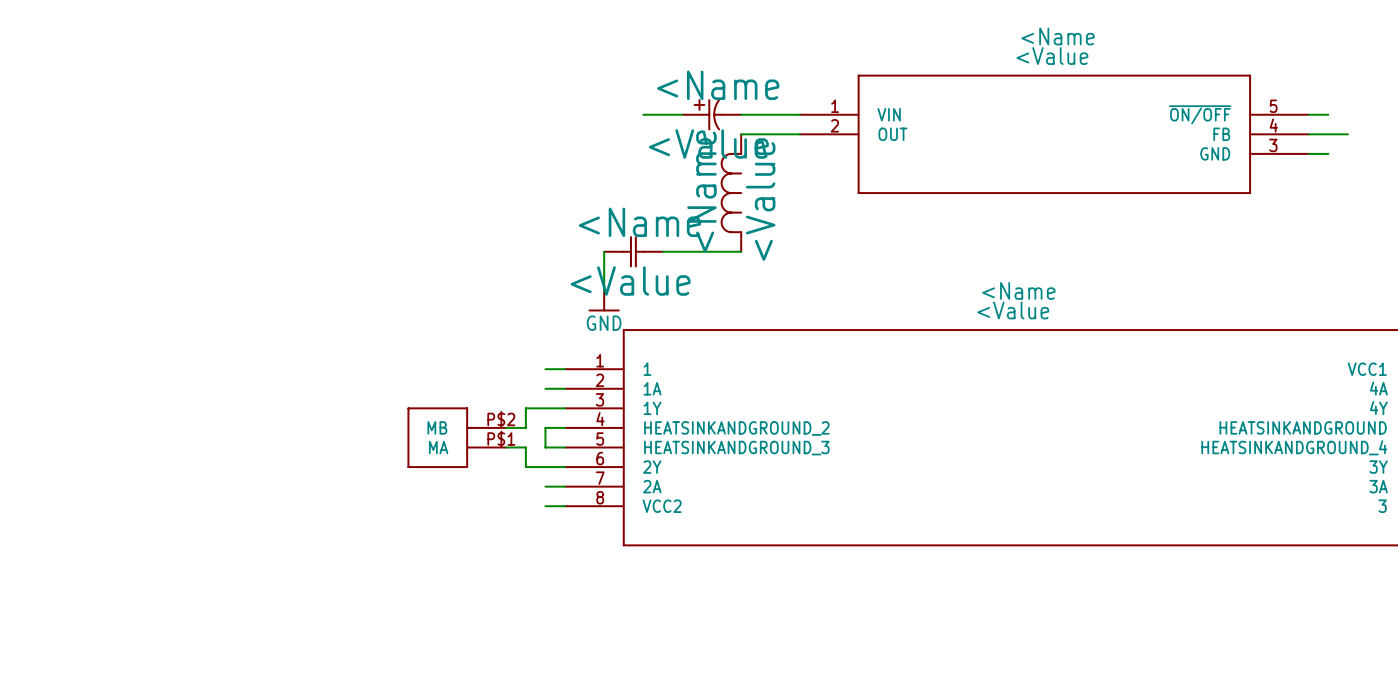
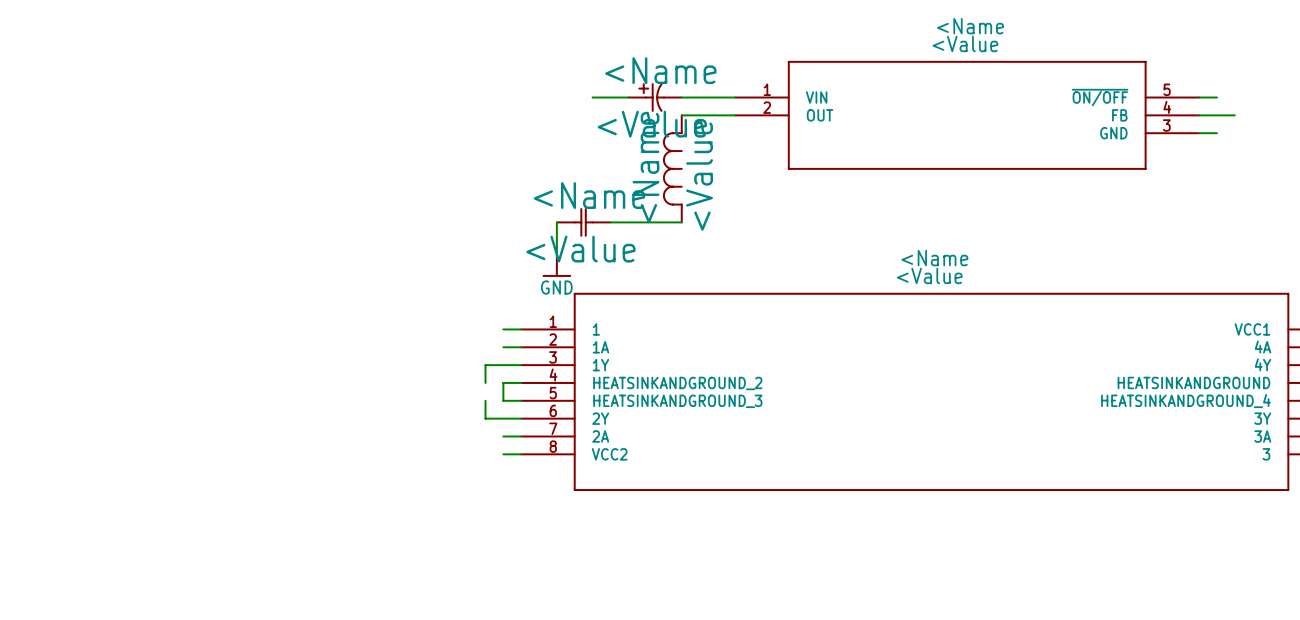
wire: (506, 427) (525, 427) -> none
part: (456, 437) -> none
wire: (506, 447) (525, 447) -> none

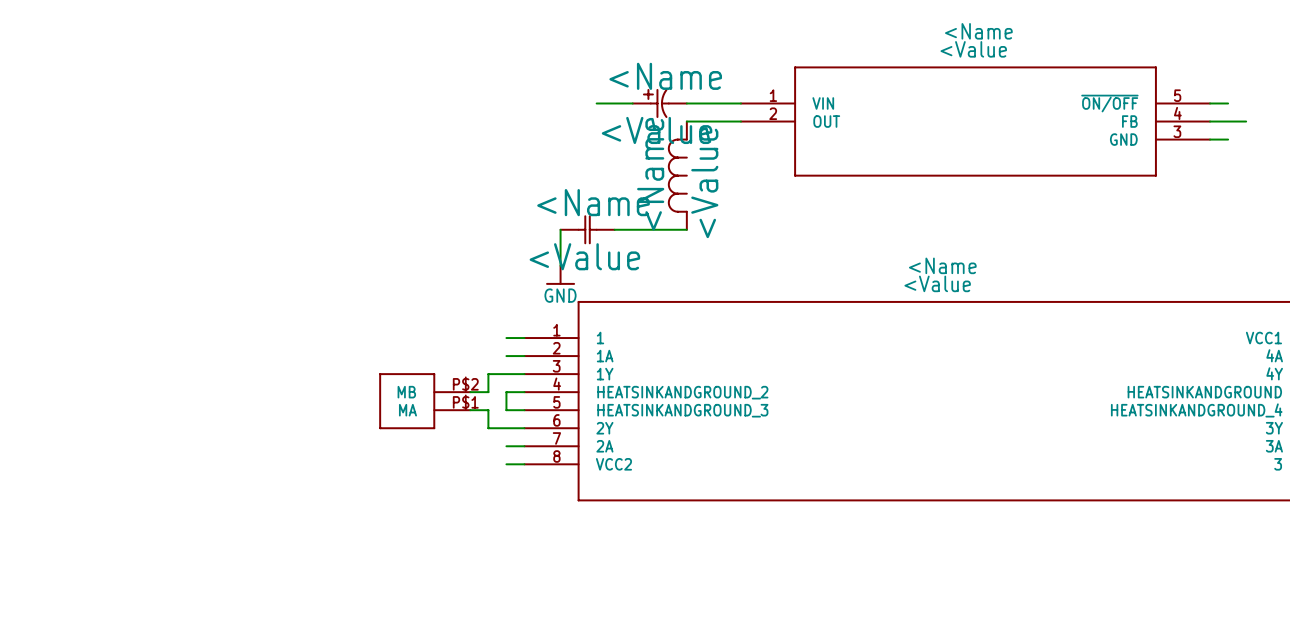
wire: none -> (470, 392) (488, 392)
part: none -> (424, 401)
wire: none -> (470, 410) (488, 410)

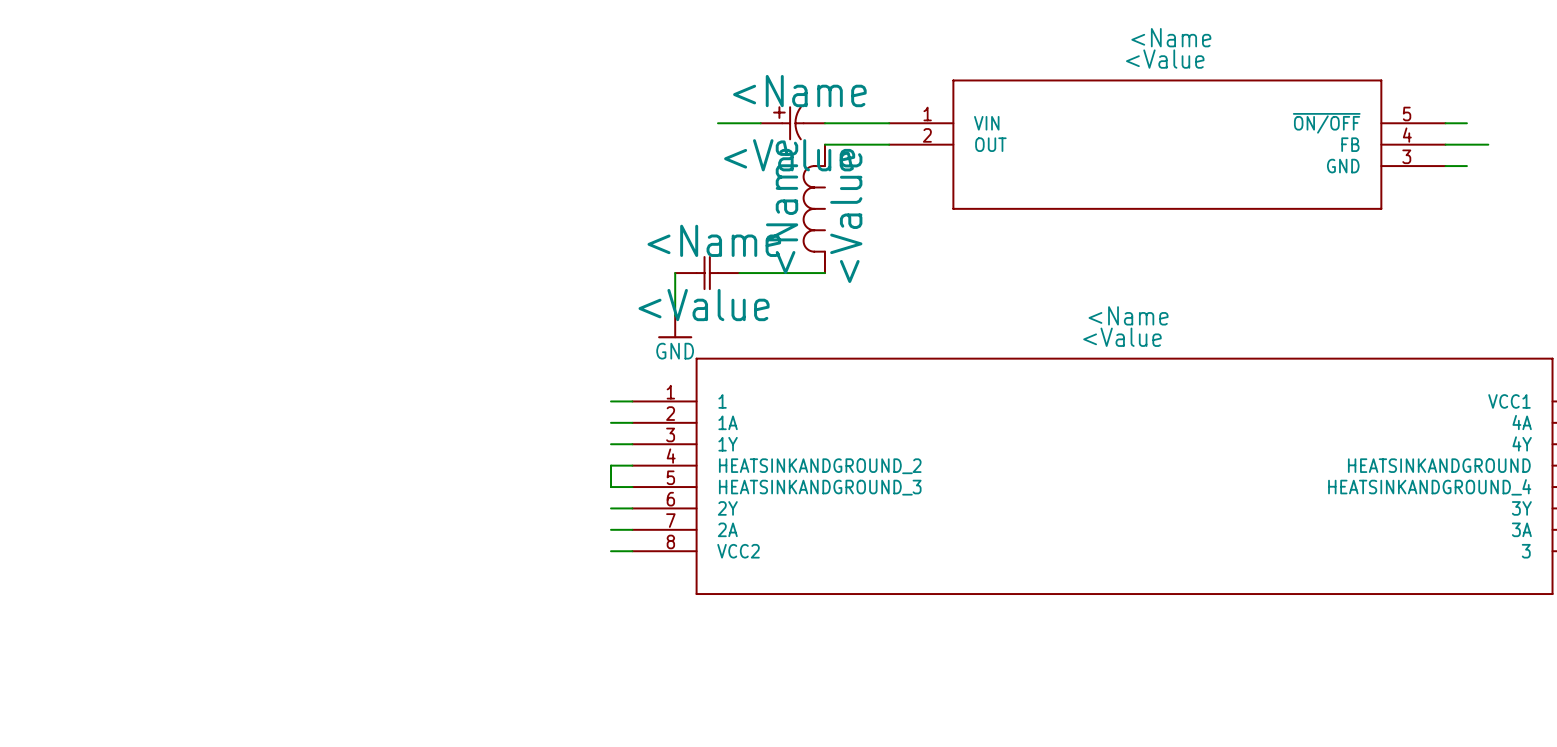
wire: (506, 374) (488, 374) (488, 392) (470, 392) -> none
part: (424, 401) -> none
wire: (470, 410) (488, 410) (488, 428) (506, 428) -> none

